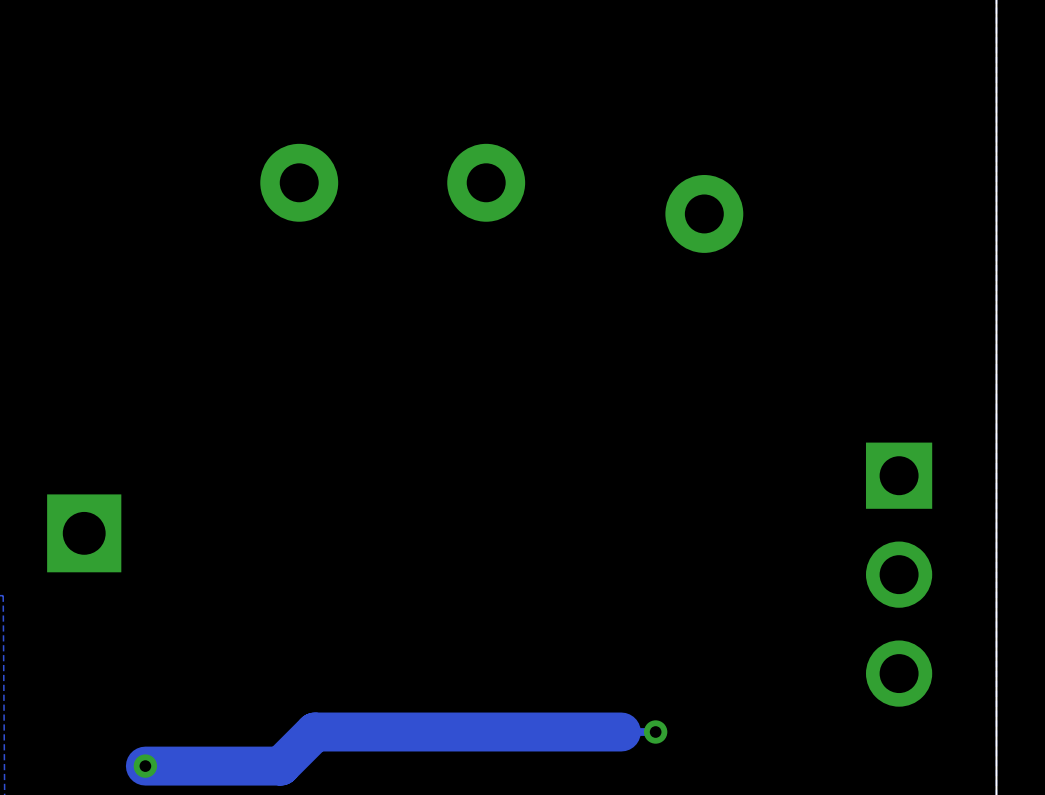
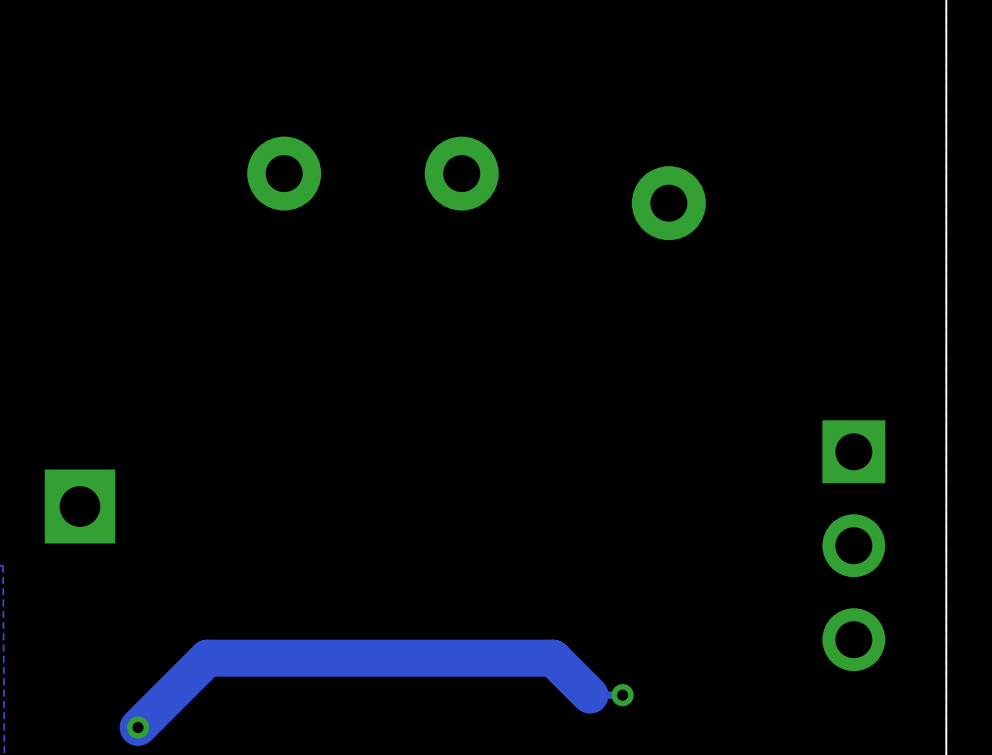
track: (621, 732) (314, 732) (280, 766) (145, 766) -> (590, 695) (553, 658) (207, 658) (138, 727)

